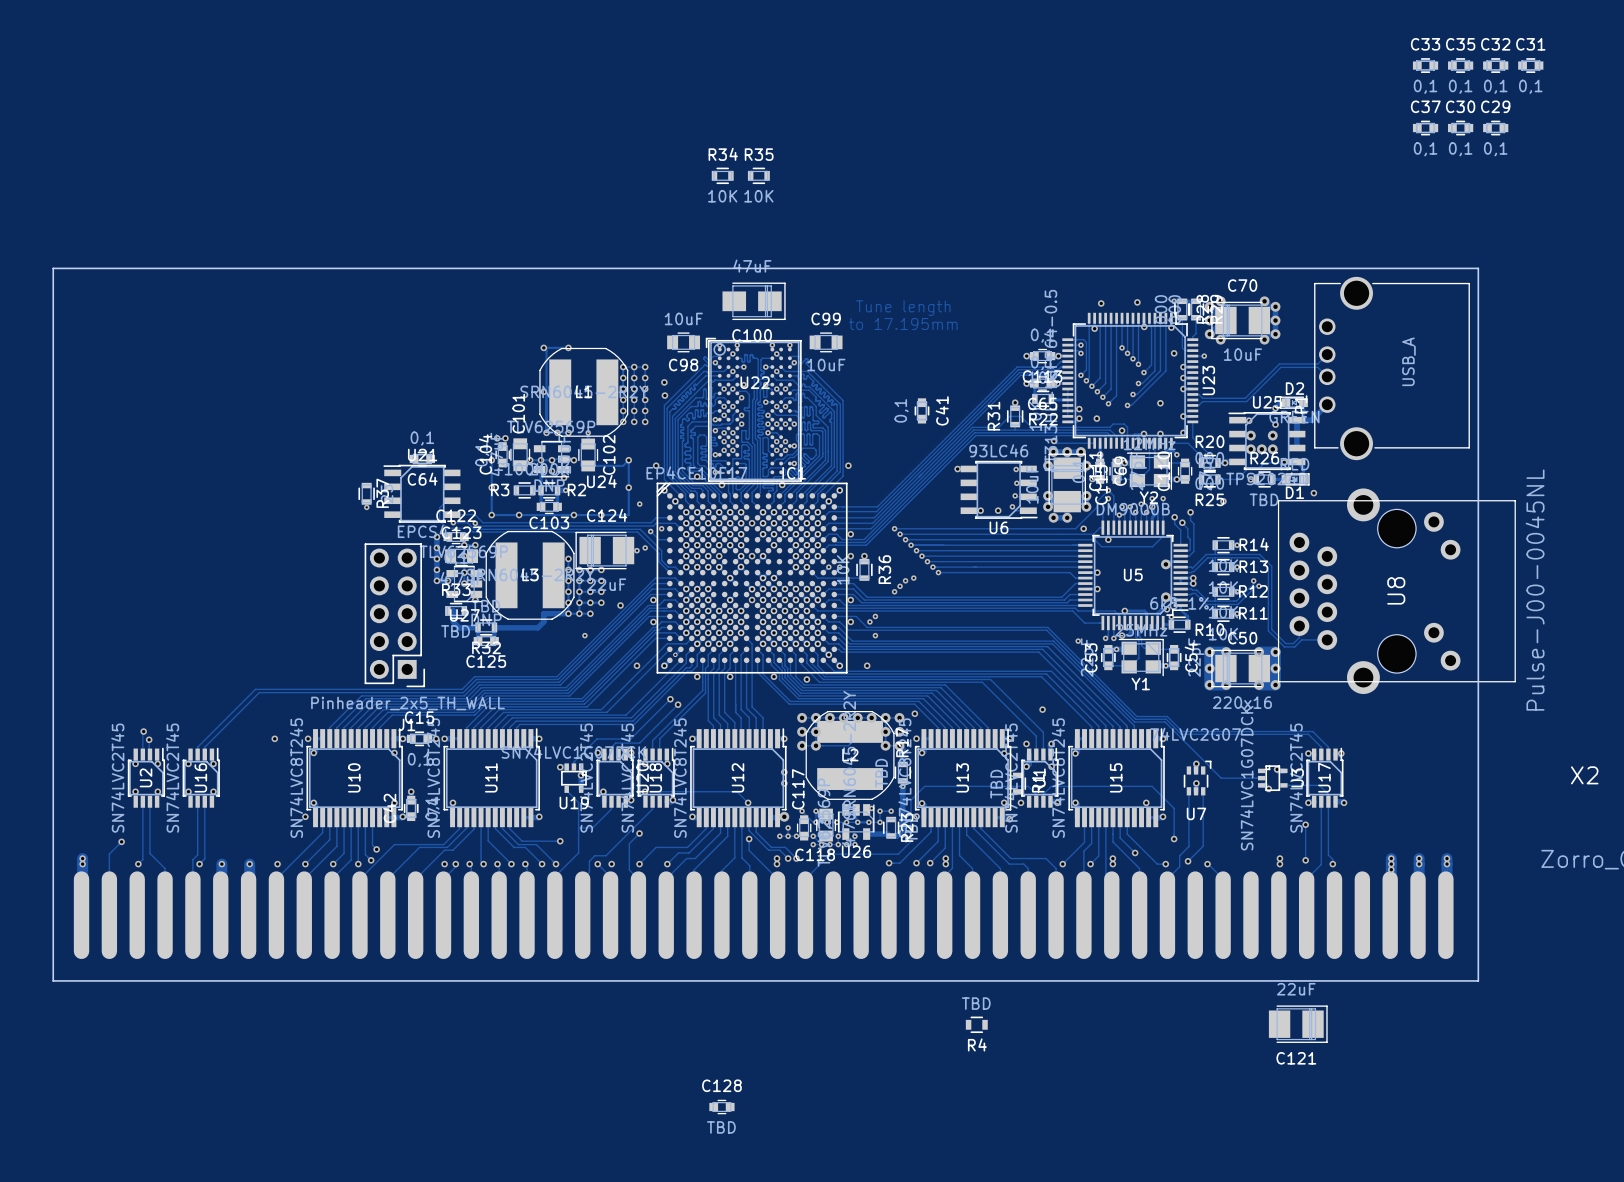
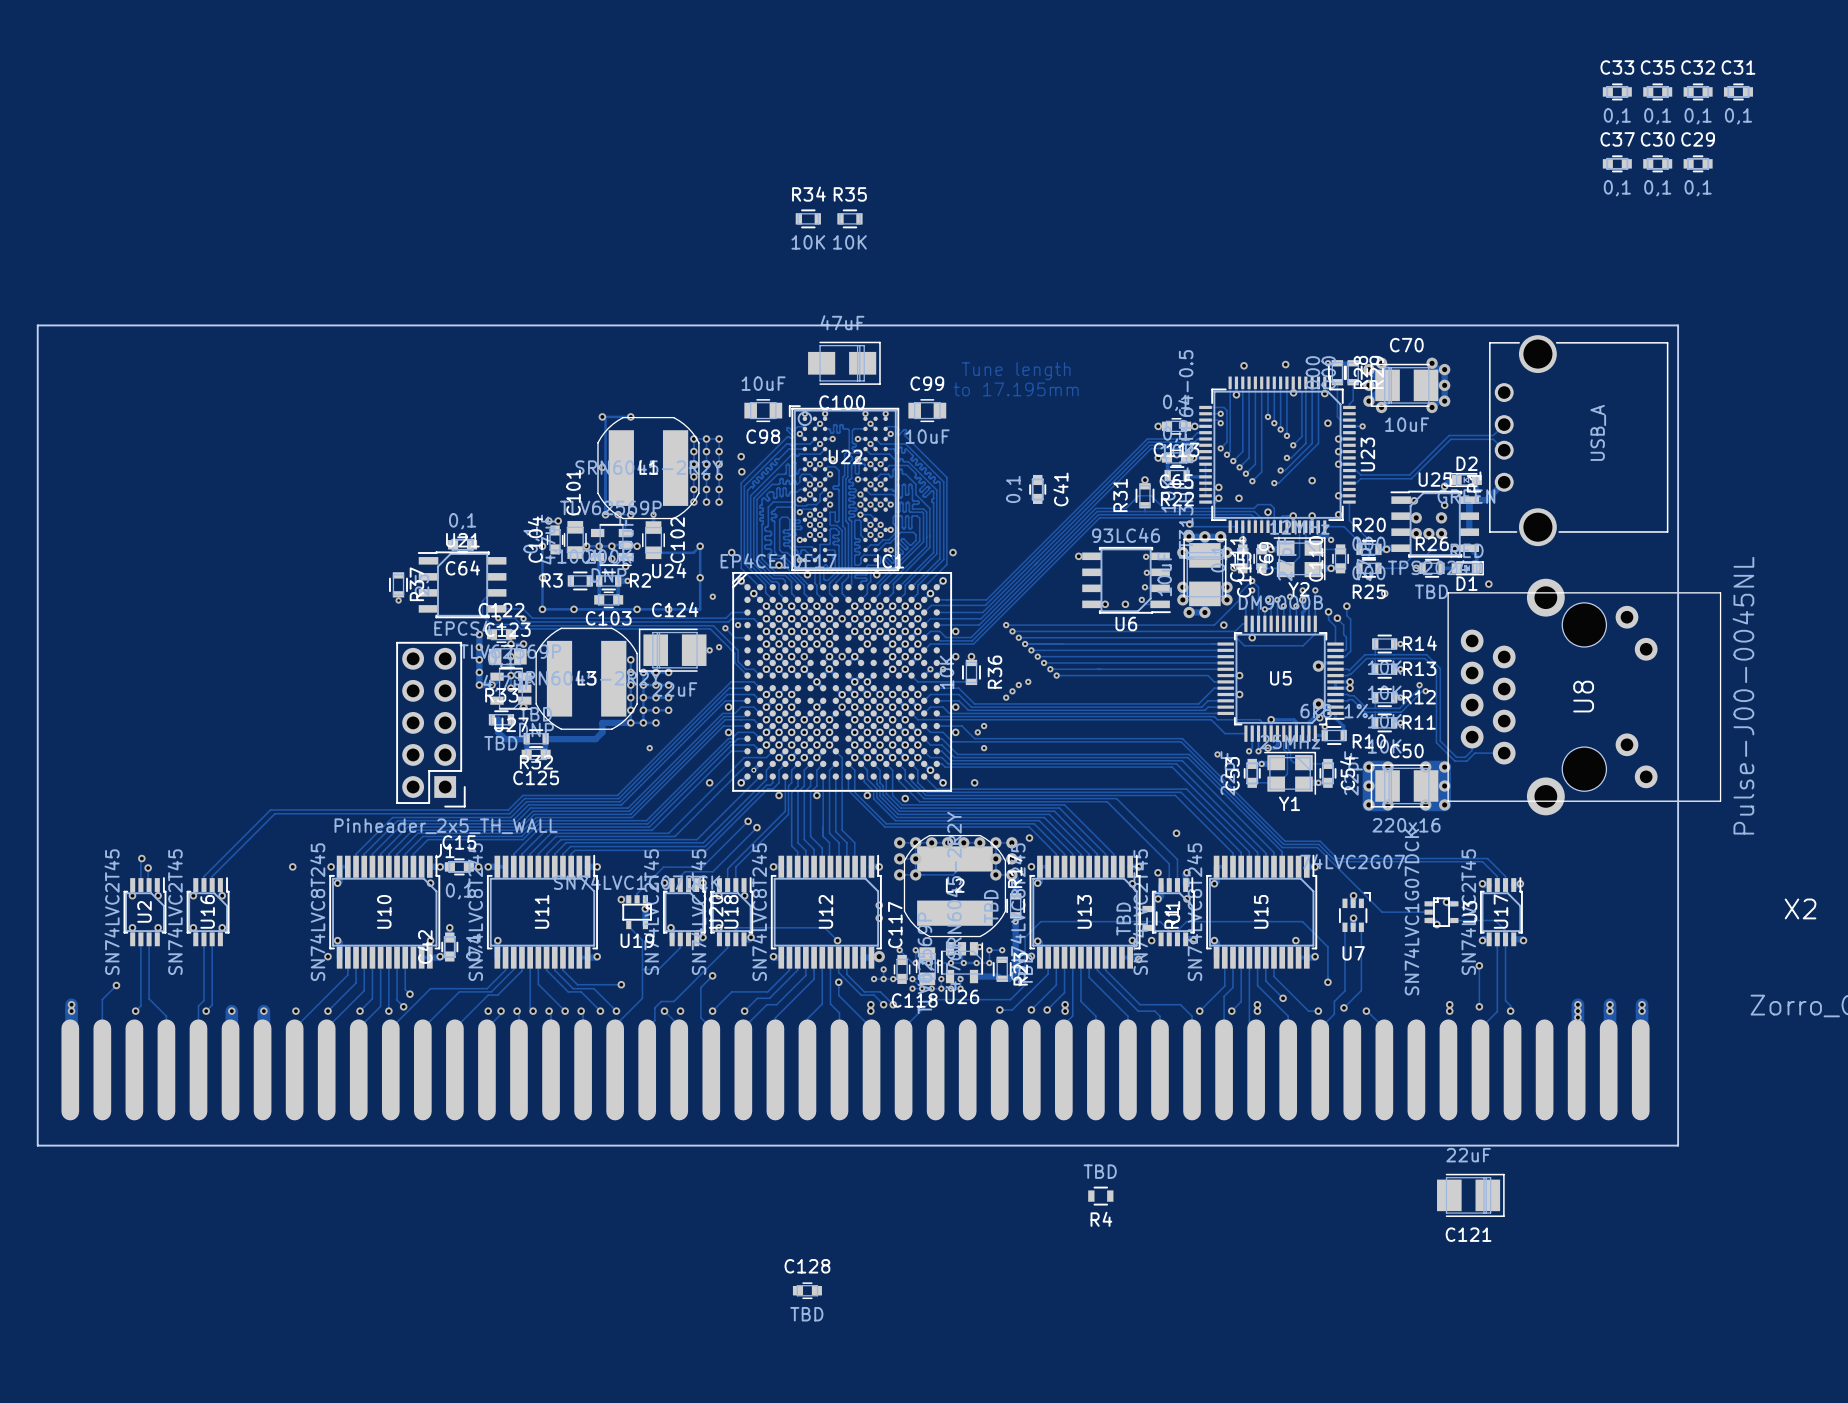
via: (620, 605) -> none

